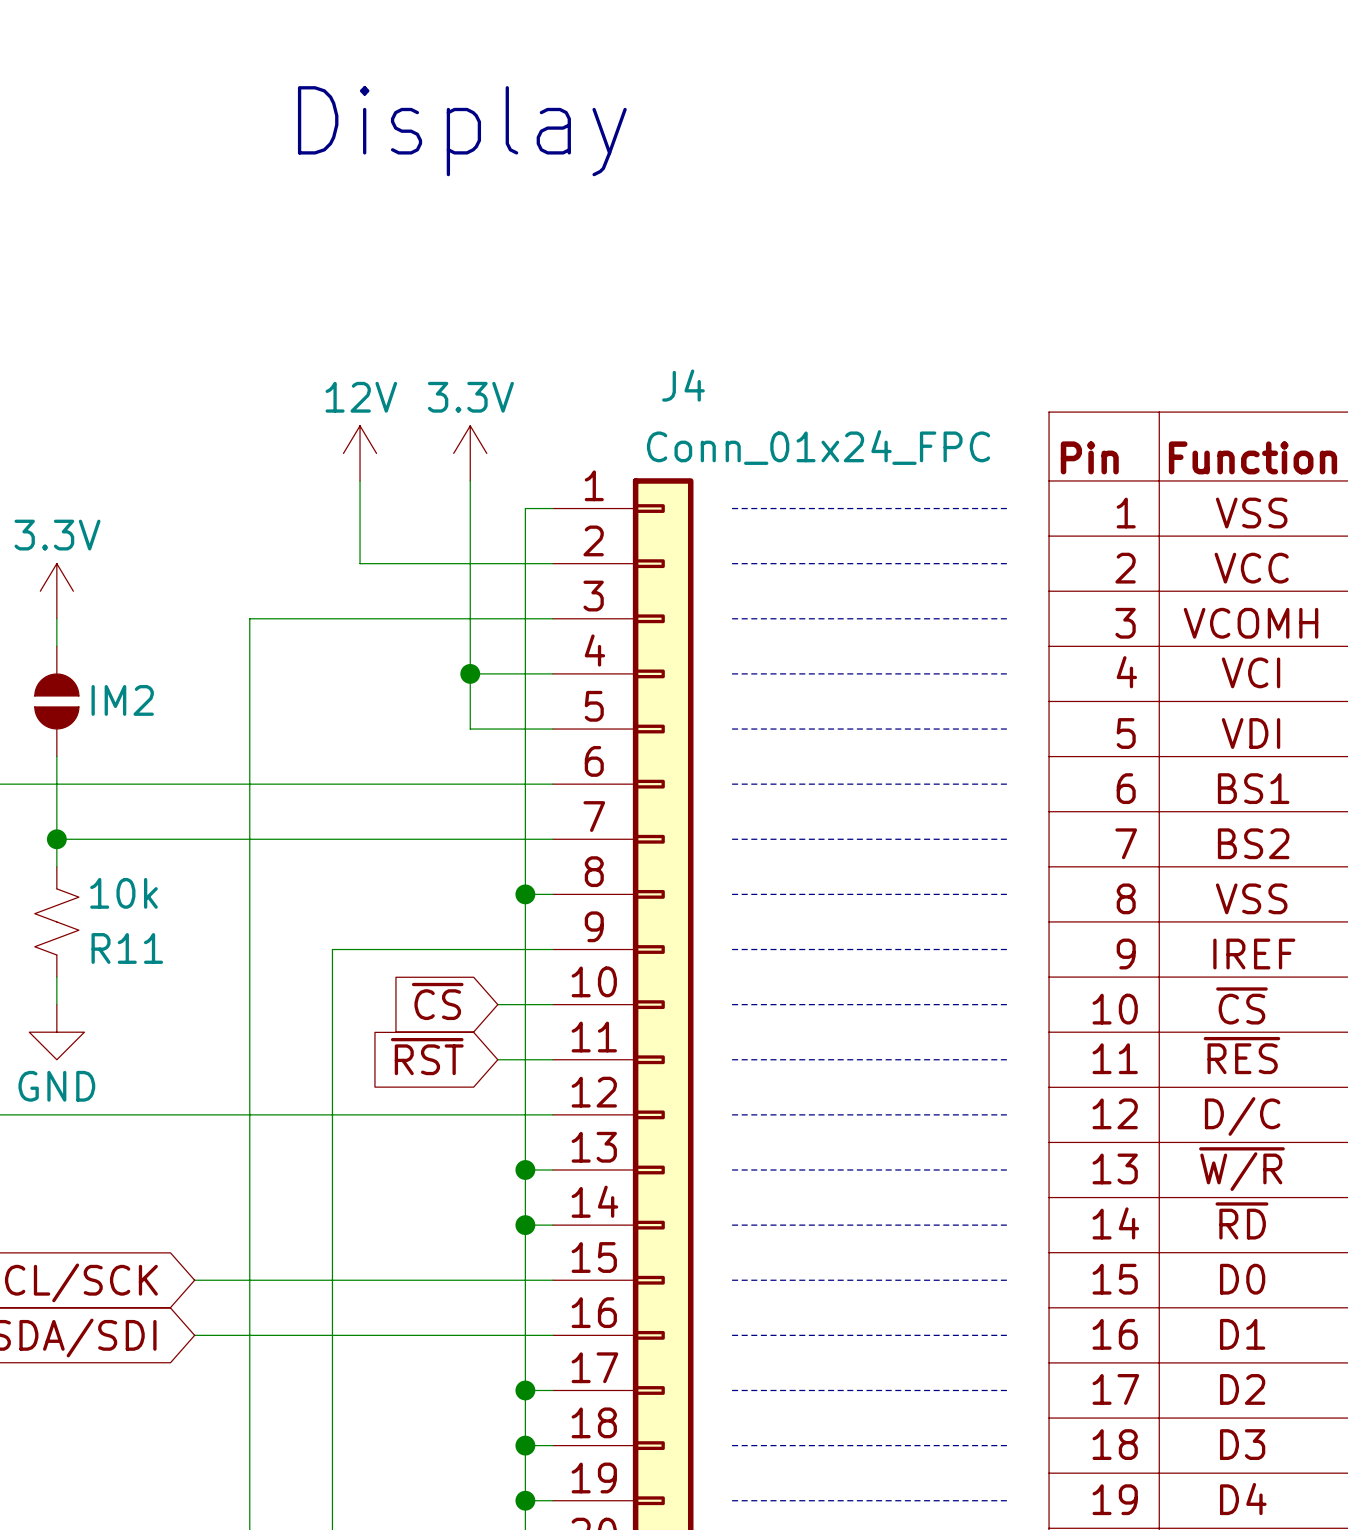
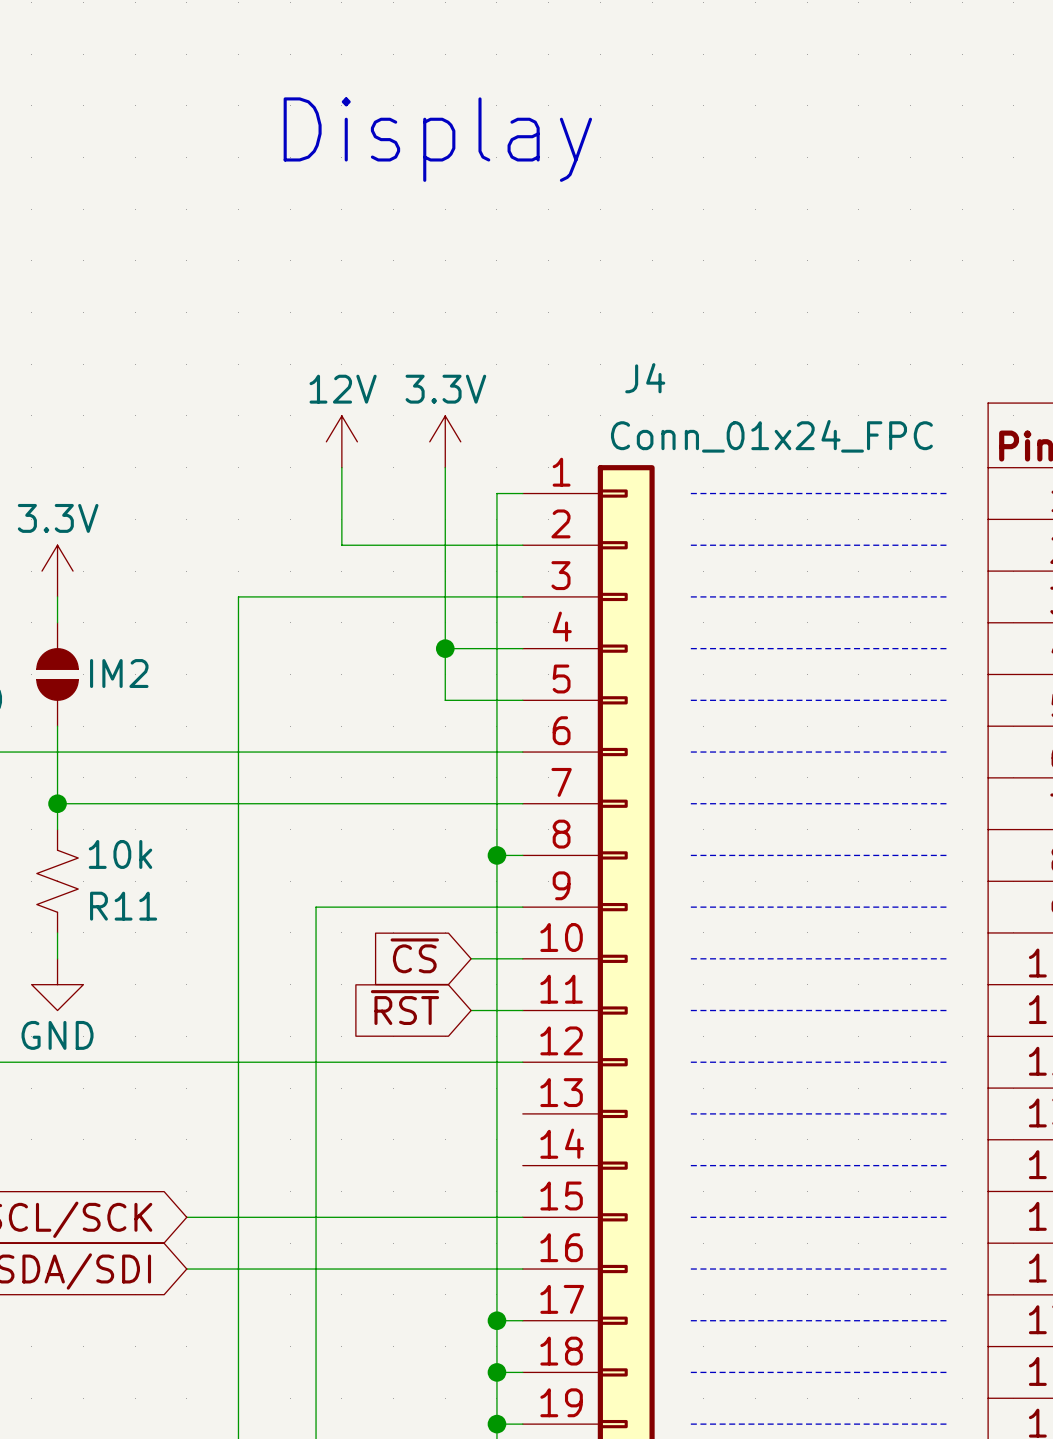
wire: (525, 1170) (552, 1170) -> none
junction: (525, 1170) -> none
wire: (525, 1225) (552, 1225) -> none
junction: (525, 1225) -> none

